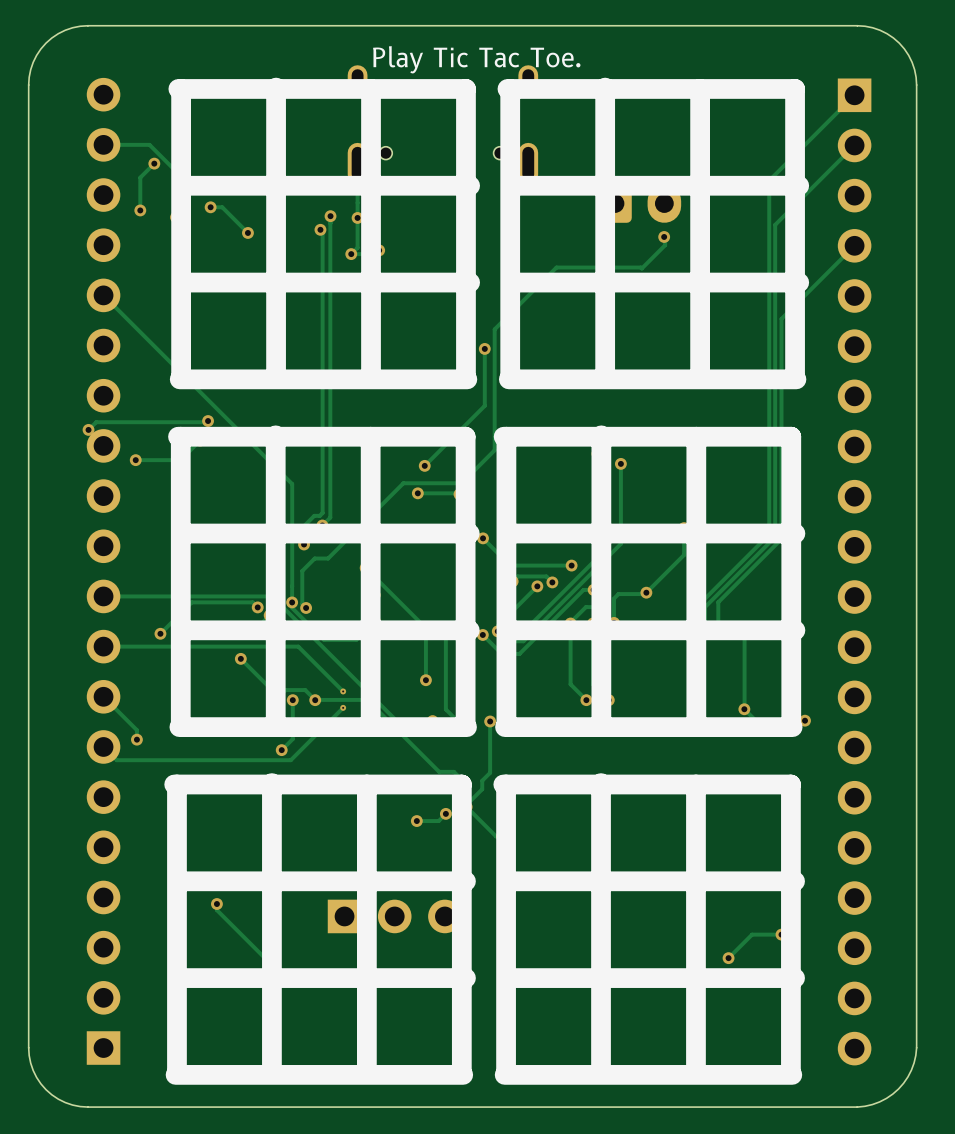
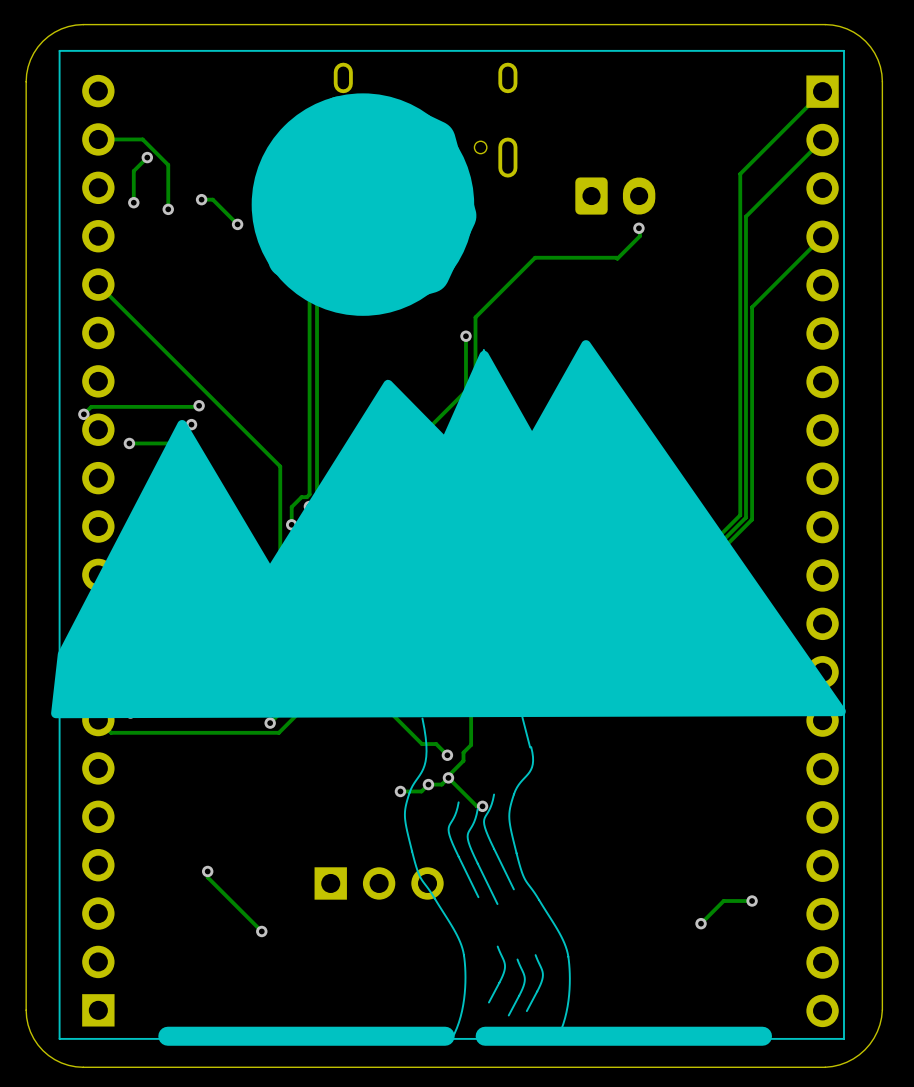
line: none -> (843, 50) (59, 50) (59, 1038) (843, 1038) (843, 50)
text: Play Tic Tac Toe. (476, 59) -> none
line: (276, 87) (276, 375) -> none
line: (605, 87) (605, 375) -> none
line: (178, 88) (465, 88) (465, 376) -> none
line: (181, 88) (181, 376) -> none
line: (371, 88) (371, 376) -> none
line: (507, 88) (795, 88) (795, 376) -> none
line: (510, 88) (510, 376) -> none
line: (700, 88) (700, 376) -> none
drawing: none -> [251, 93, 477, 316]
line: (470, 185) (182, 185) -> none
line: (799, 185) (511, 185) -> none
line: (470, 282) (182, 282) -> none
line: (799, 282) (511, 282) -> none
drawing: none -> [51, 340, 846, 719]
line: (467, 379) (179, 379) -> none
line: (796, 379) (508, 379) -> none
line: (275, 435) (275, 722) -> none
line: (601, 435) (601, 722) -> none
line: (178, 436) (465, 436) (465, 724) -> none
line: (180, 436) (180, 724) -> none
line: (370, 436) (370, 724) -> none
line: (503, 436) (791, 436) (791, 724) -> none
line: (506, 436) (506, 724) -> none
line: (696, 436) (696, 724) -> none
line: (469, 533) (182, 533) -> none
line: (795, 533) (507, 533) -> none
line: (469, 630) (182, 630) -> none
line: (795, 630) (507, 630) -> none
line: (467, 727) (179, 727) -> none
line: (792, 727) (505, 727) -> none
line: none -> (522, 717) (530, 747)
line: none -> (422, 718) (426, 744) (425, 761) (409, 793) (405, 809) (405, 820) (419, 875) (453, 928) (463, 951) (465, 977) (464, 999) (458, 1022) (451, 1038)
line: none -> (531, 747) (532, 767) (515, 790) (510, 807) (509, 819) (524, 877) (557, 929) (567, 953) (569, 978) (568, 1000) (563, 1024) (556, 1040)
line: (271, 783) (271, 1070) -> none
line: (601, 783) (601, 1070) -> none
line: (174, 784) (461, 784) (461, 1072) -> none
line: (176, 784) (176, 1072) -> none
line: (366, 784) (366, 1072) -> none
line: (503, 784) (790, 784) (790, 1072) -> none
line: (506, 784) (506, 1072) -> none
line: (695, 784) (695, 1072) -> none
line: none -> (494, 794) (484, 818) (484, 824) (513, 889)
line: none -> (458, 802) (449, 825) (448, 832) (478, 897)
line: none -> (477, 809) (468, 832) (467, 839) (497, 904)
line: (465, 881) (178, 881) -> none
line: (795, 881) (507, 881) -> none
line: (465, 978) (178, 978) -> none
line: (795, 978) (507, 978) -> none
line: none -> (497, 946) (504, 961) (504, 968) (488, 1002)
line: none -> (535, 955) (542, 970) (542, 977) (526, 1011)
line: none -> (517, 959) (524, 974) (524, 981) (508, 1015)

